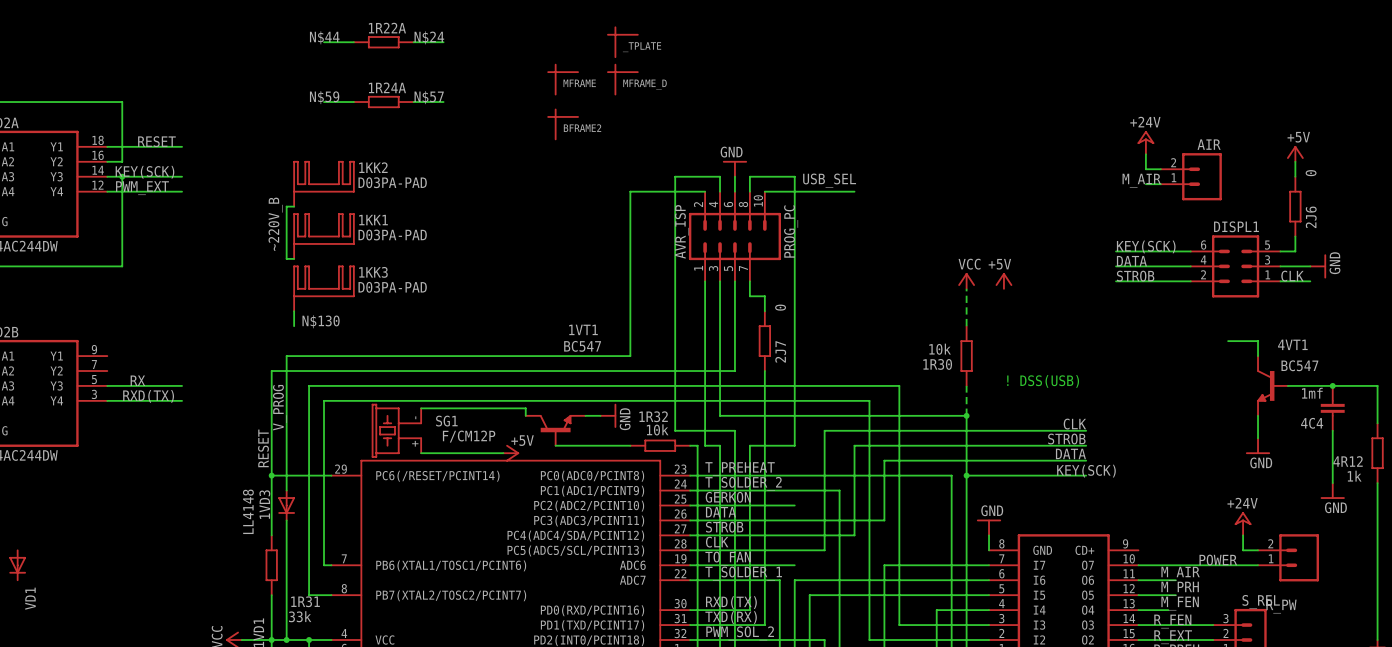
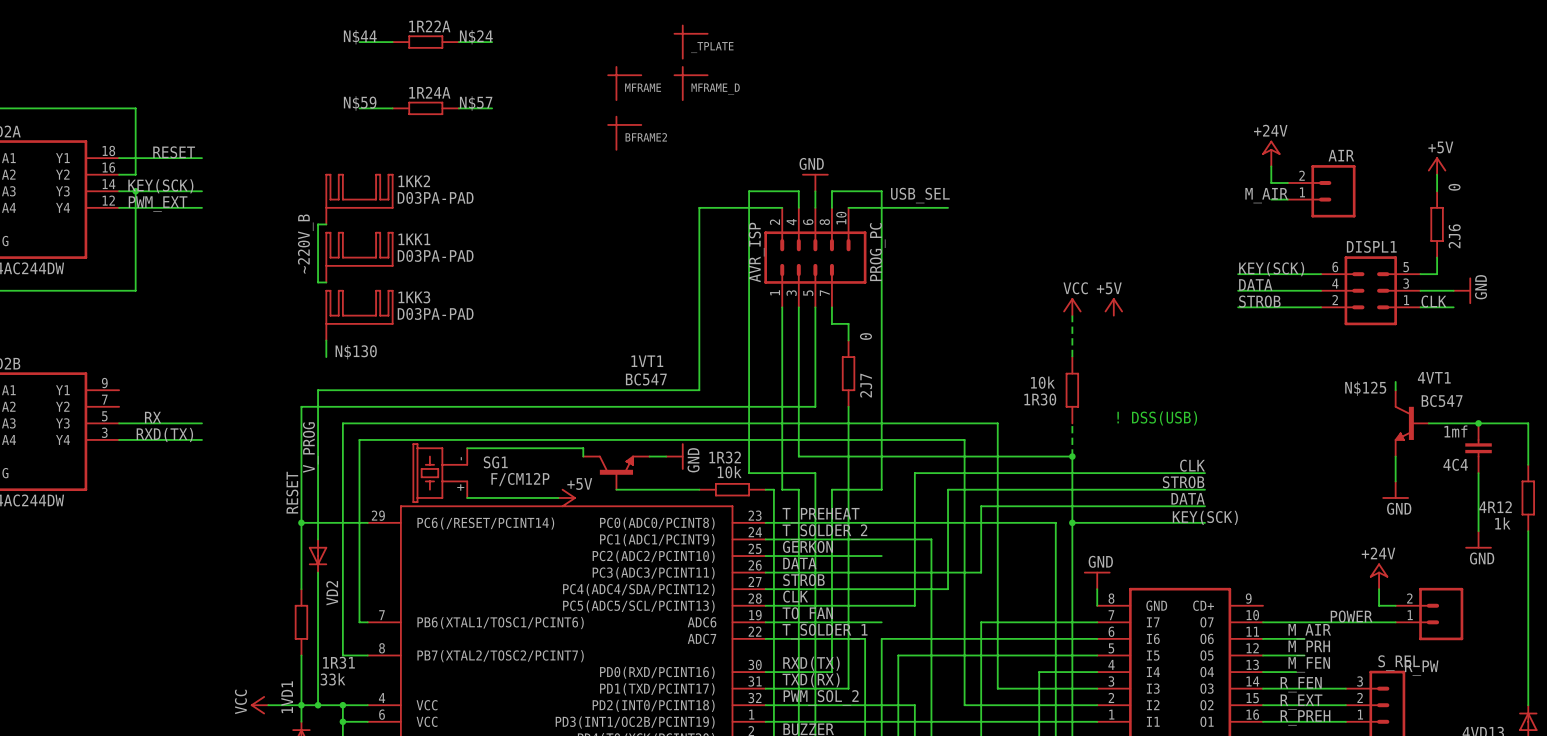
wire: (1228, 341) (1258, 341) (1258, 348) -> none
label: none -> N$125 (1365, 388)
1VD3 name: 1VD3 (264, 504) -> VD2 (332, 593)
1VD3 value: LL4148 (248, 511) -> none
VD1: (17, 565) -> none

